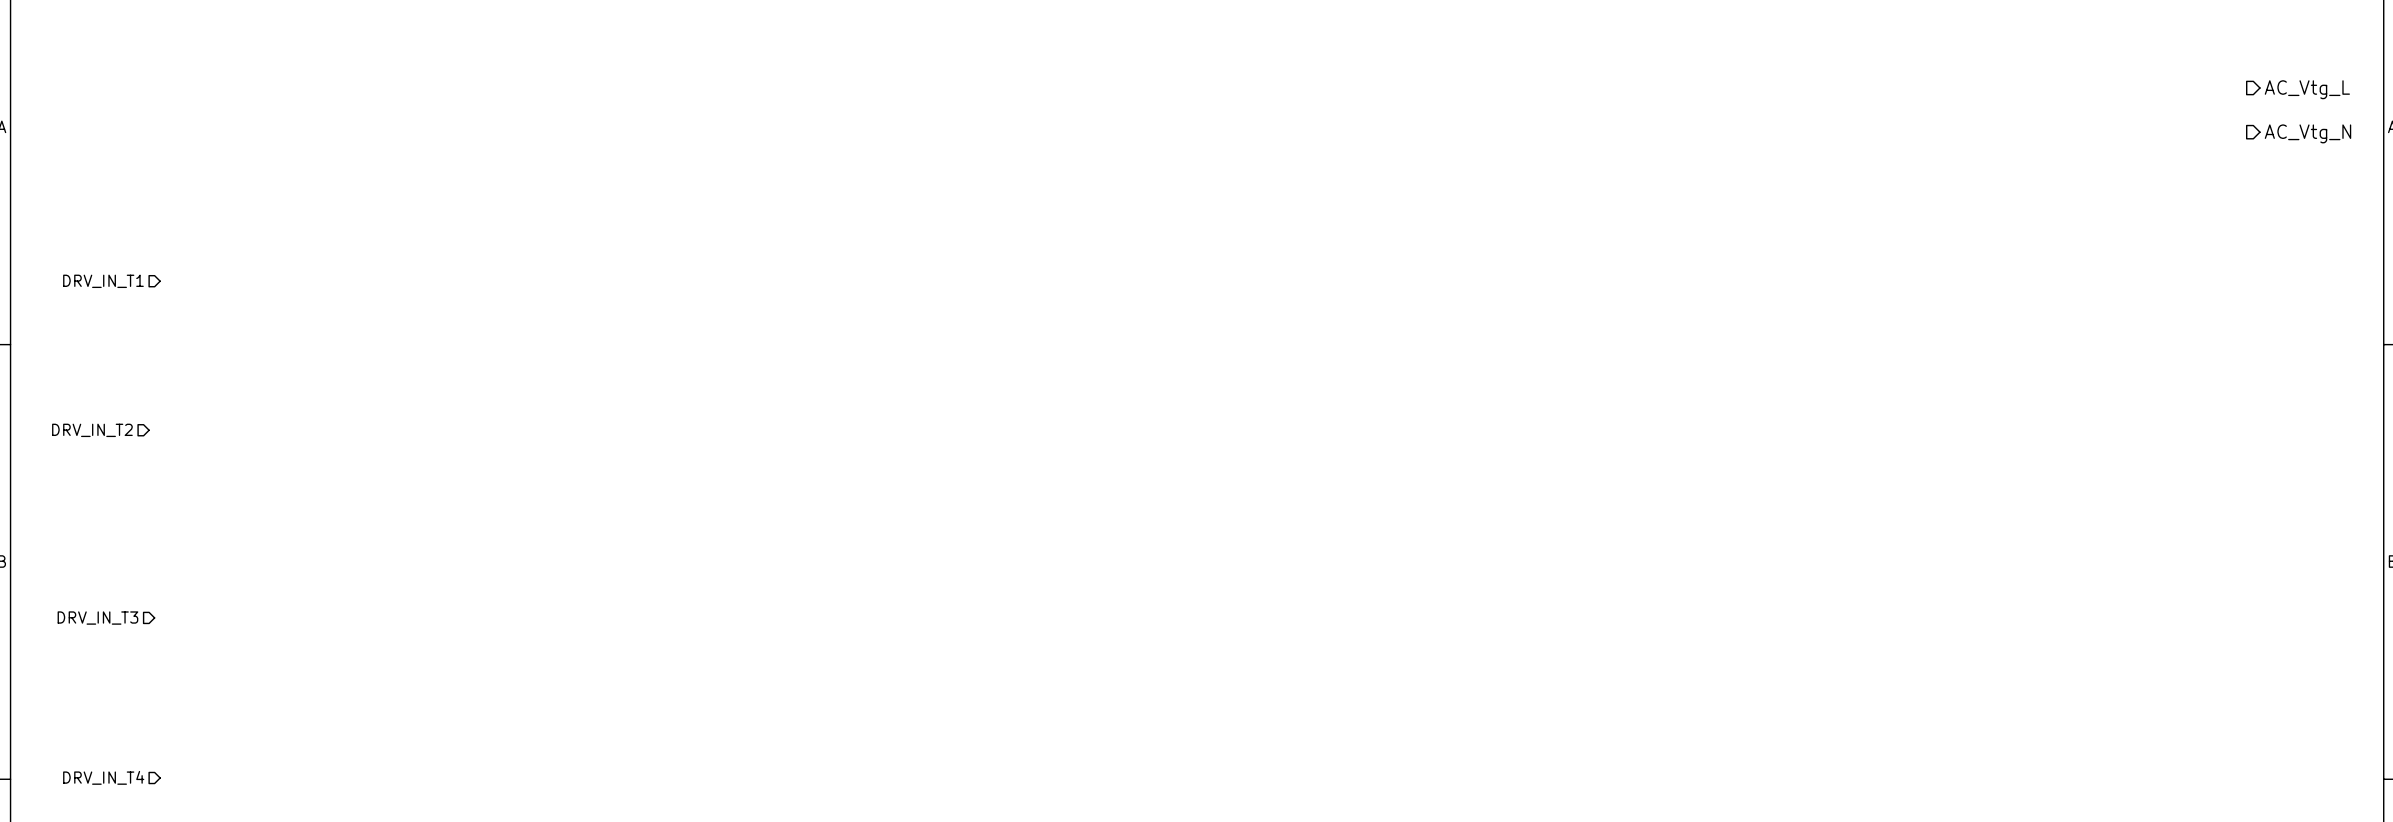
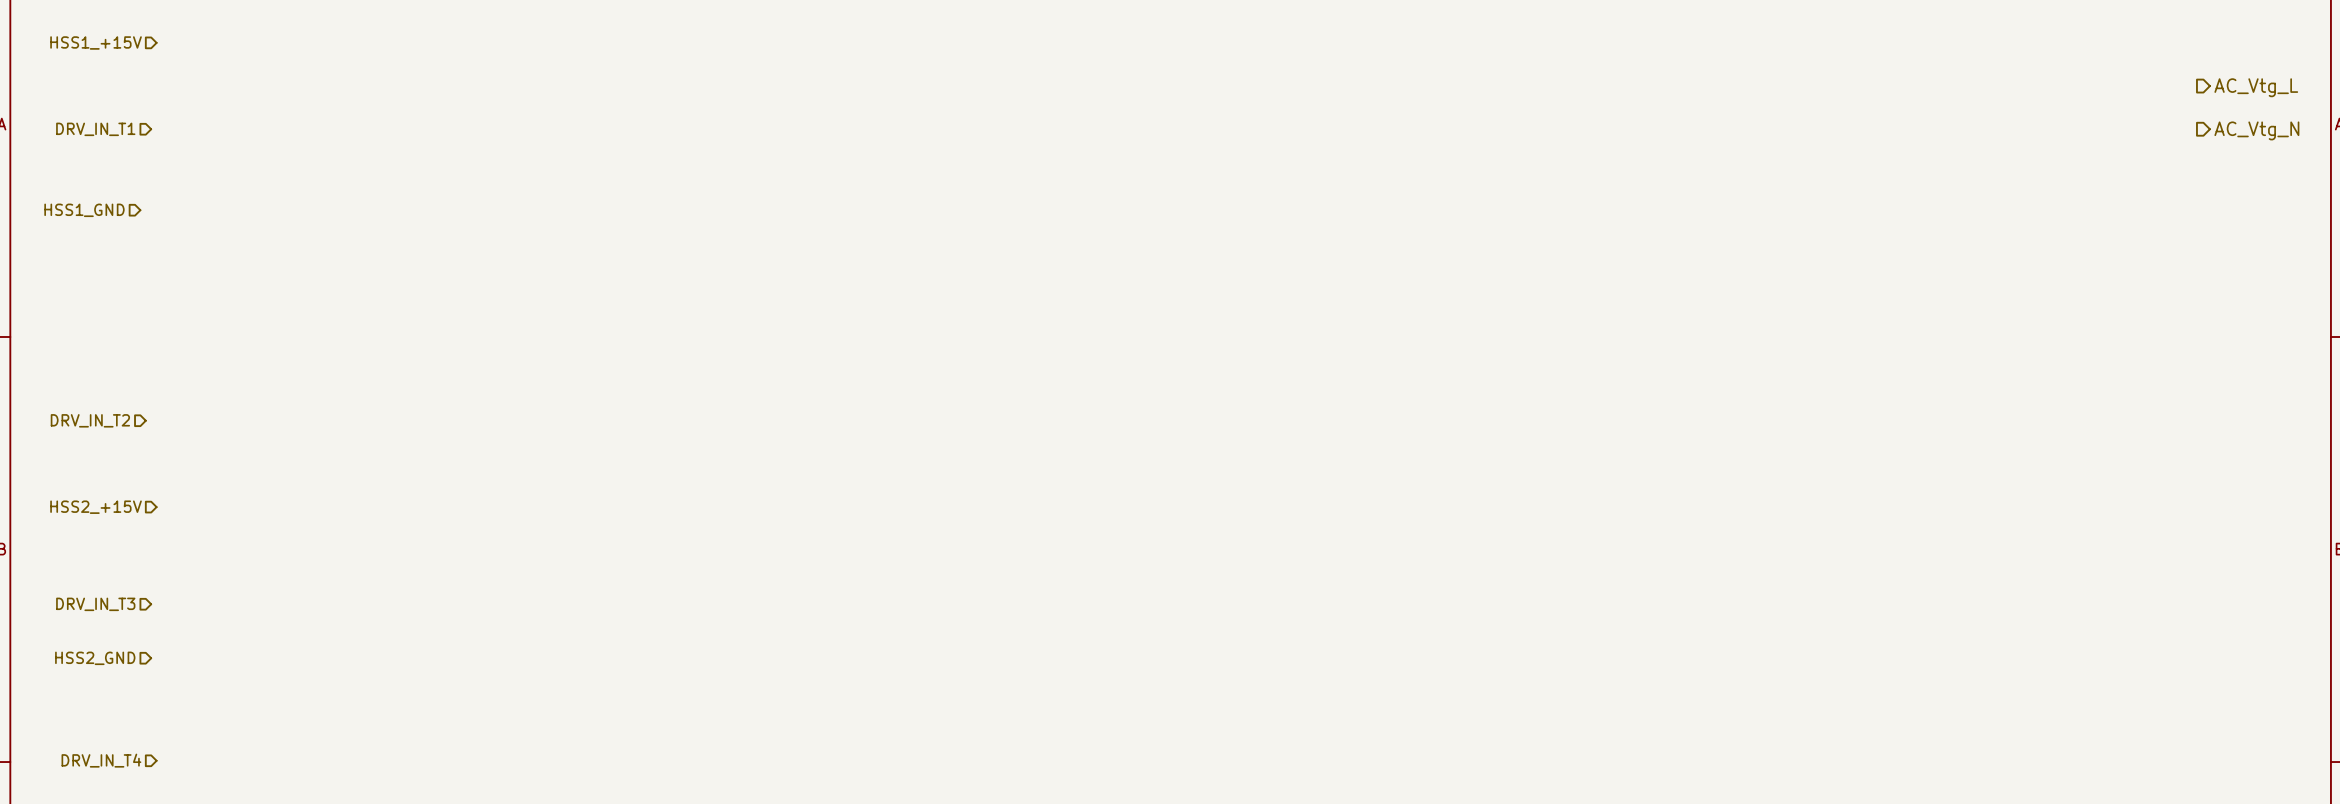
hierarchical label: none -> HSS1_+15V (96, 42)
hierarchical label: none -> HSS1_GND (84, 210)
hierarchical label position: DRV_IN_T1 (103, 281) -> DRV_IN_T1 (95, 129)
hierarchical label: none -> HSS2_+15V (96, 507)
hierarchical label: none -> HSS2_GND (95, 658)

